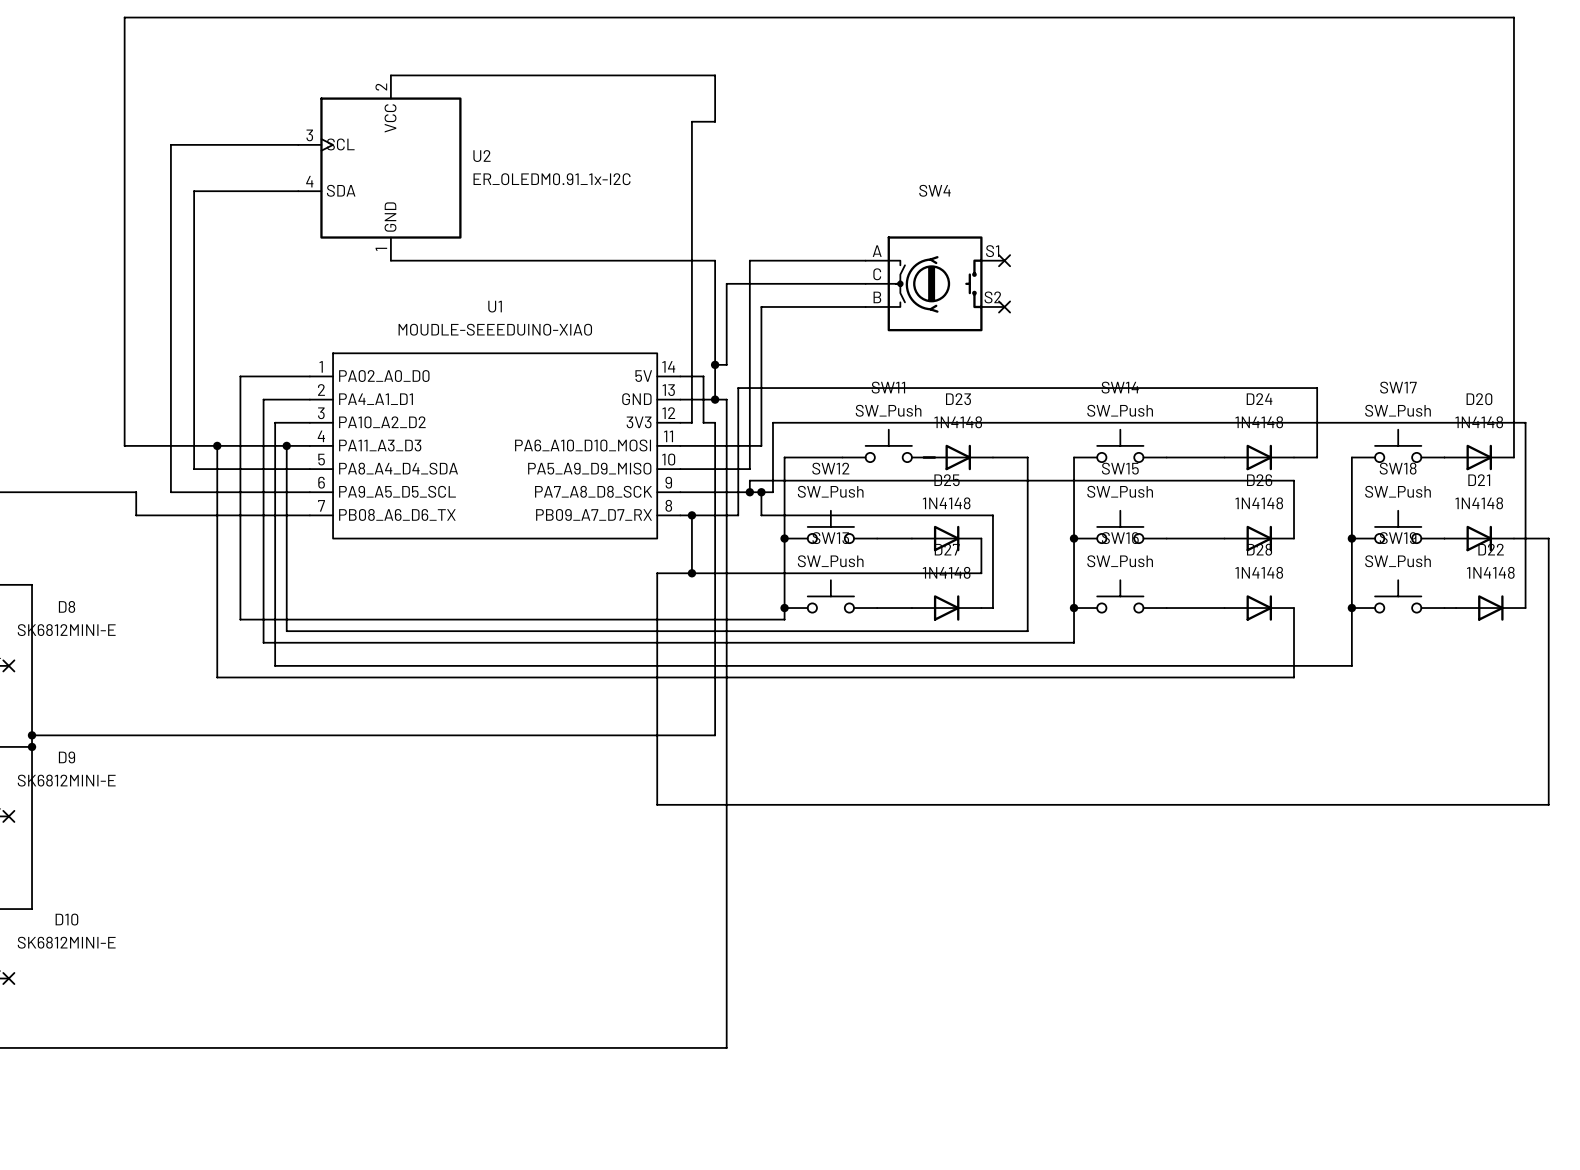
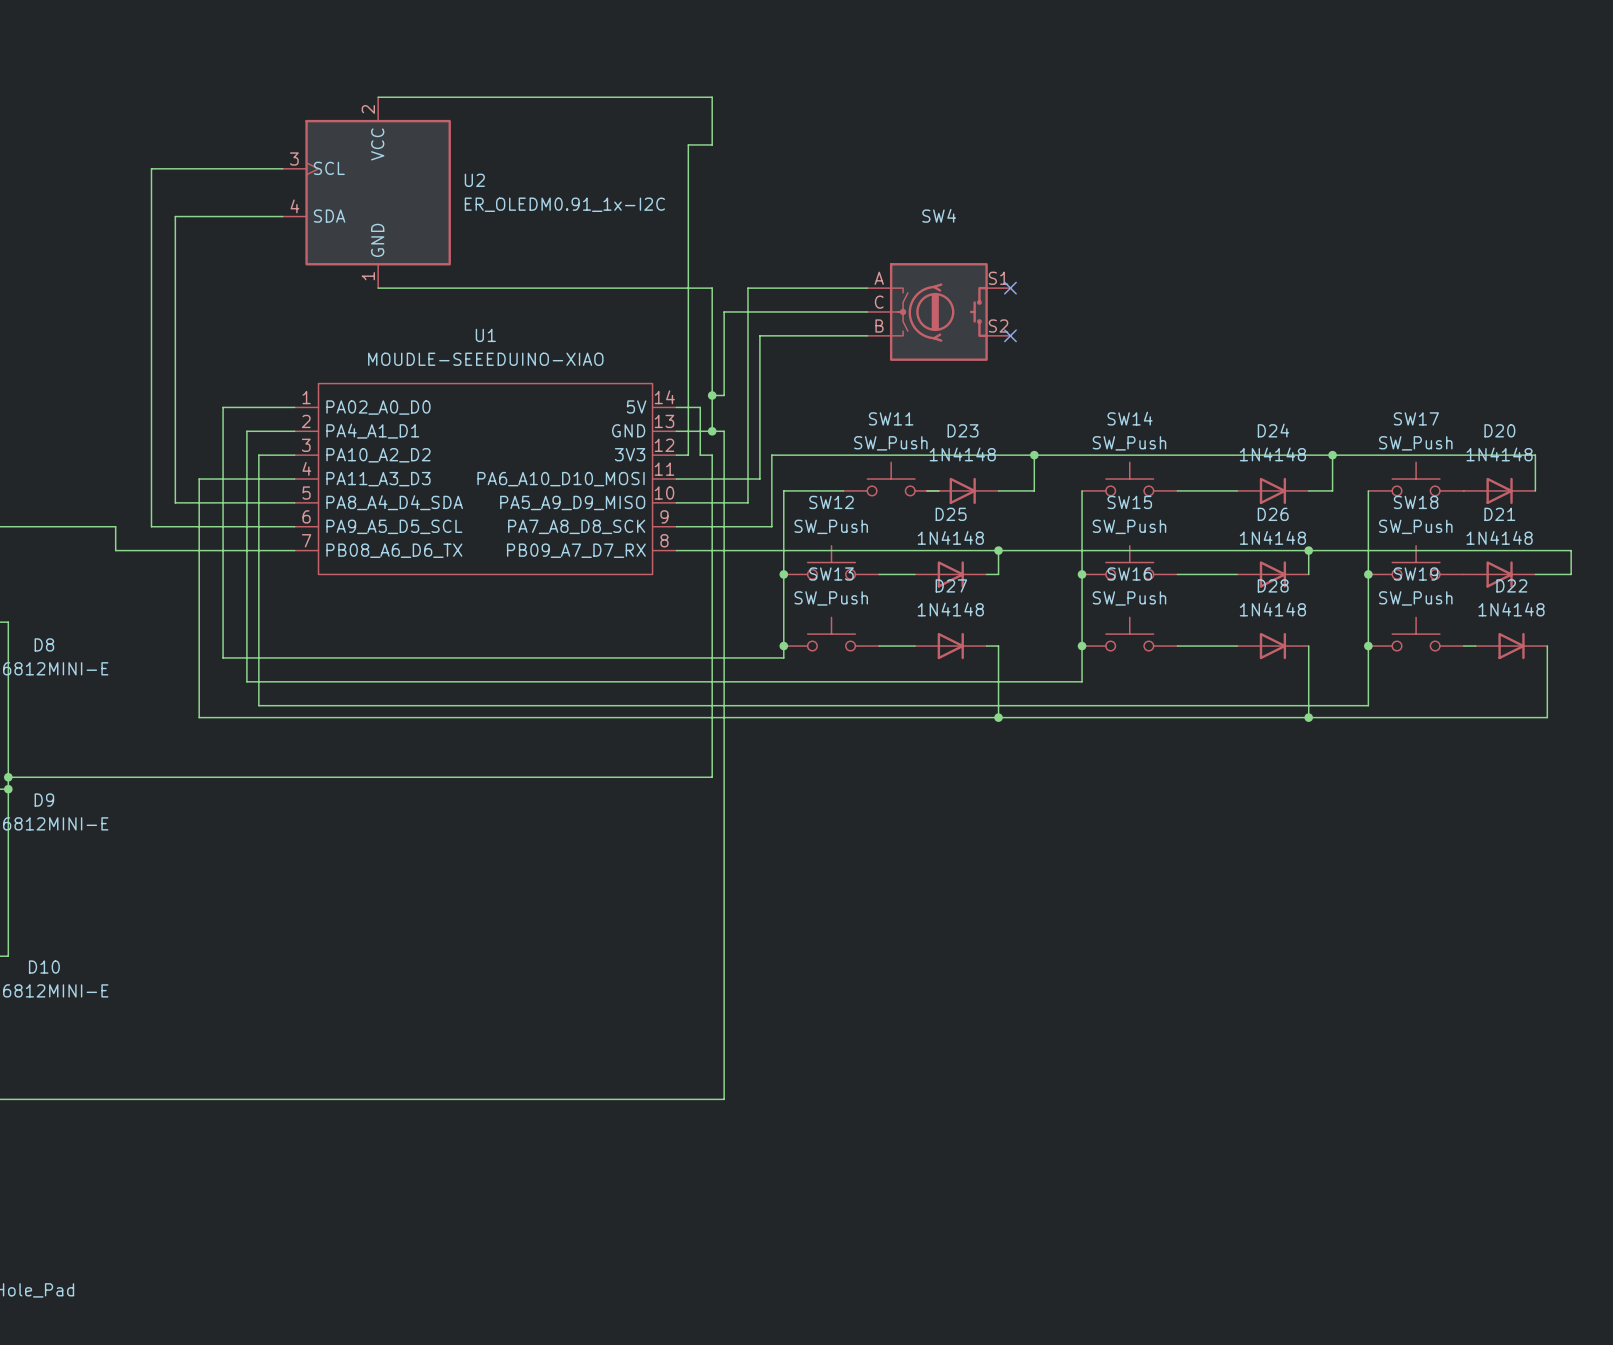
junction: none -> (1034, 455)
wire: (1317, 422) (1317, 388) (738, 388) (738, 515) -> none
junction: none -> (1332, 455)
wire: (217, 445) (124, 445) (124, 17) (1513, 17) (1513, 422) (1525, 422) (1525, 608) -> (1308, 717) (1547, 717) (1547, 646)
junction: (217, 445) -> none
wire: (286, 445) (286, 631) (1027, 631) (1027, 457) -> (1034, 455) (1034, 490)
junction: (286, 445) -> none
wire: (749, 492) (749, 480) (1294, 480) (1294, 515) -> none
junction: (749, 492) -> none
wire: (761, 492) (761, 515) -> (736, 550) (759, 550)
junction: (761, 492) -> none
wire: (691, 515) (691, 573) -> none
junction: (691, 515) -> none
junction: none -> (998, 550)
junction: none -> (1308, 550)
wire: (981, 538) (981, 573) (657, 573) (657, 804) (1548, 804) (1548, 538) -> (998, 550) (1571, 550) (1571, 574)
wire: (992, 538) (992, 608) -> (998, 574) (986, 574)
junction: (691, 573) -> none
wire: none -> (998, 646) (998, 717)
junction: none -> (998, 717)
junction: none -> (1308, 717)

